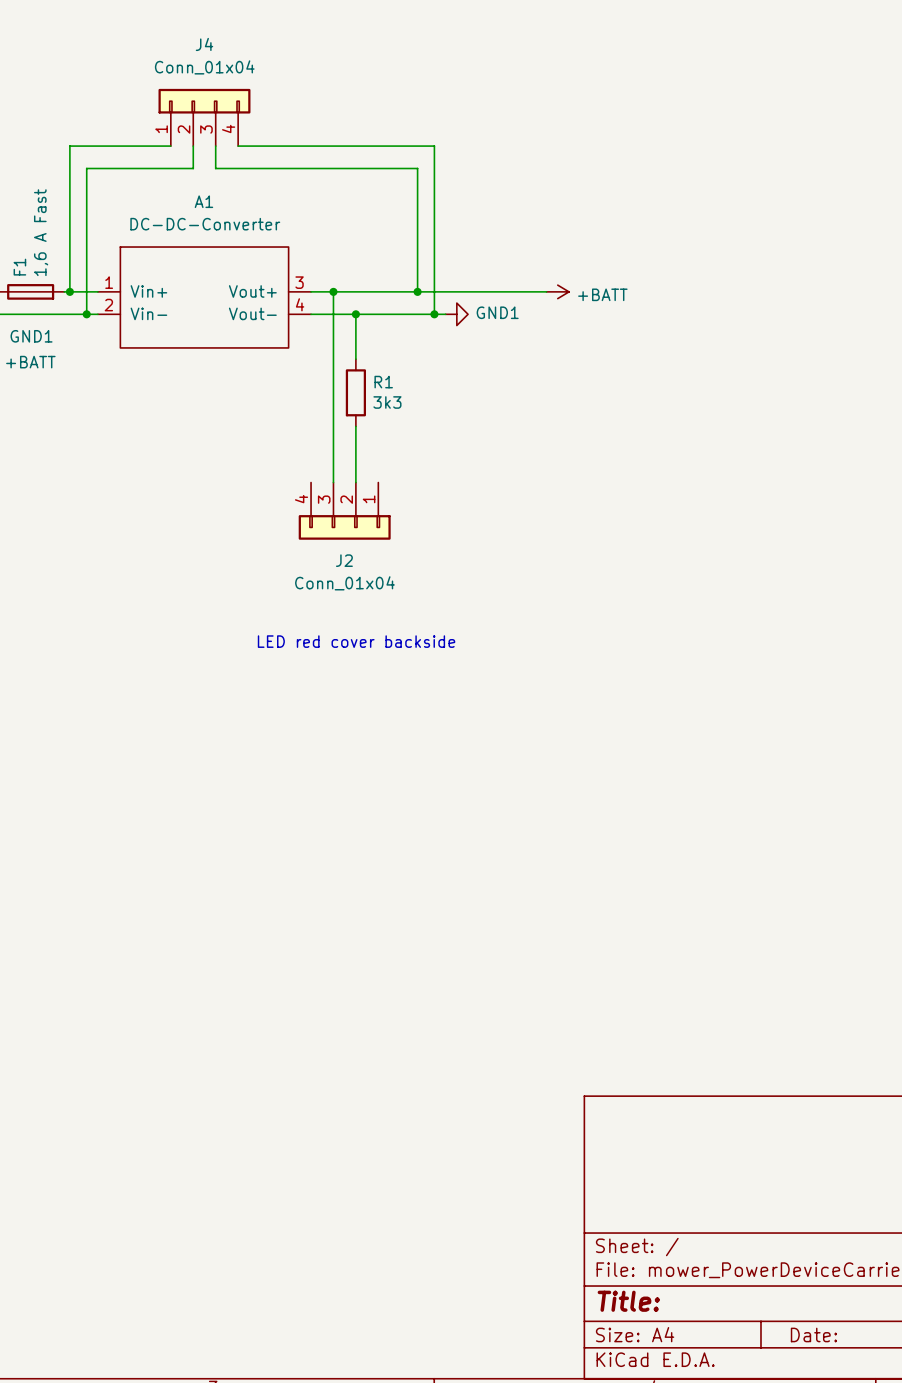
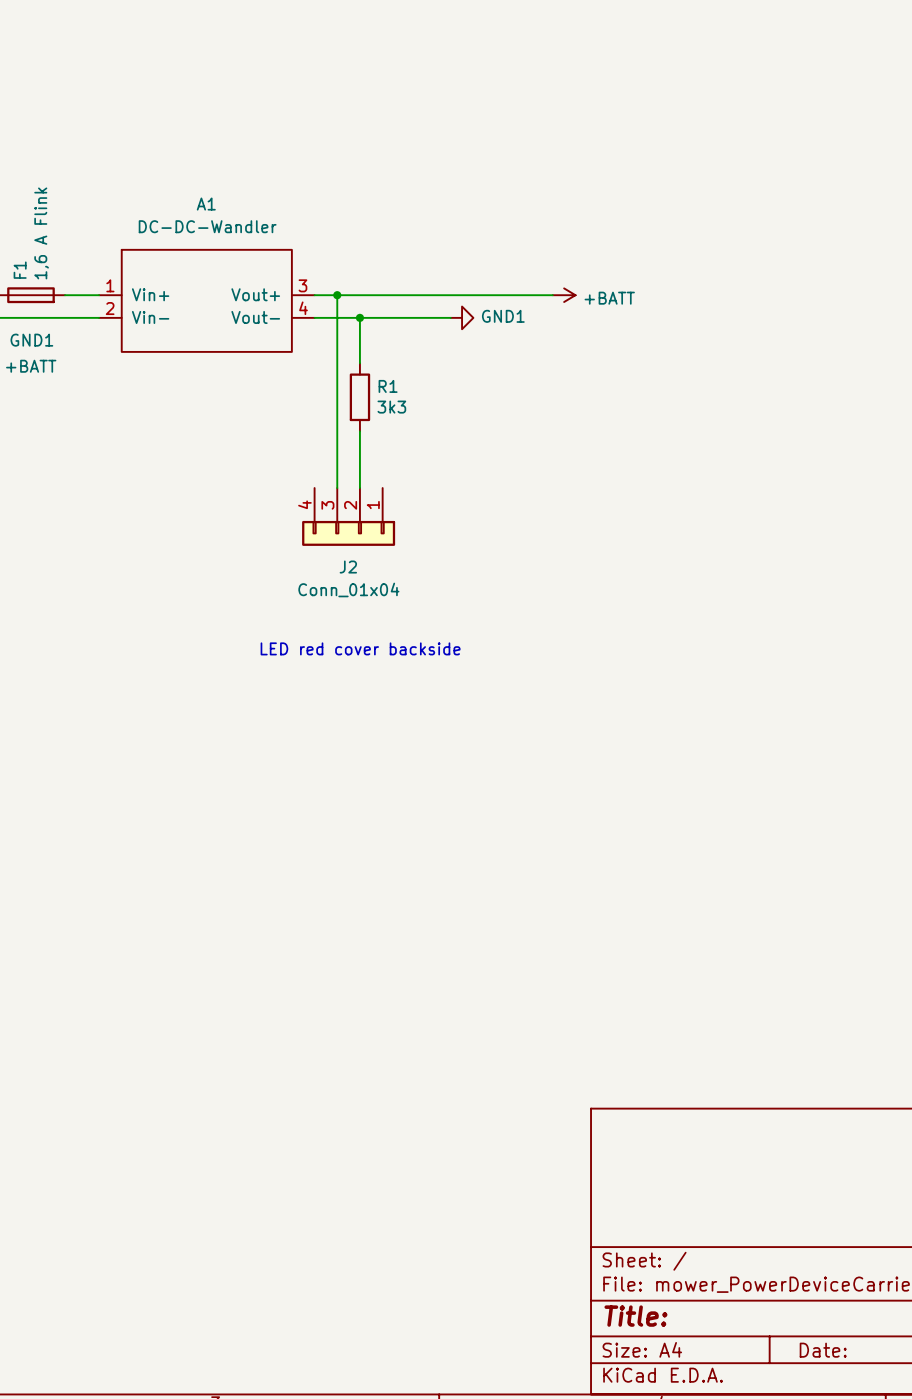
J4: Conn_01x04 (204, 117) -> none
wire: (170, 146) (69, 146) (69, 291) -> none
wire: (193, 146) (193, 168) (86, 168) (86, 314) -> none
wire: (215, 146) (215, 168) (417, 168) (417, 291) -> none
wire: (238, 146) (434, 146) (434, 314) -> none
A1 value: DC-DC-Converter (205, 224) -> DC-DC-Wandler (207, 226)
F1 value: 1,6 A Fast (41, 232) -> 1,6 A Flink (41, 233)
junction: (69, 291) -> none
junction: (417, 291) -> none
junction: (86, 314) -> none
junction: (434, 314) -> none

